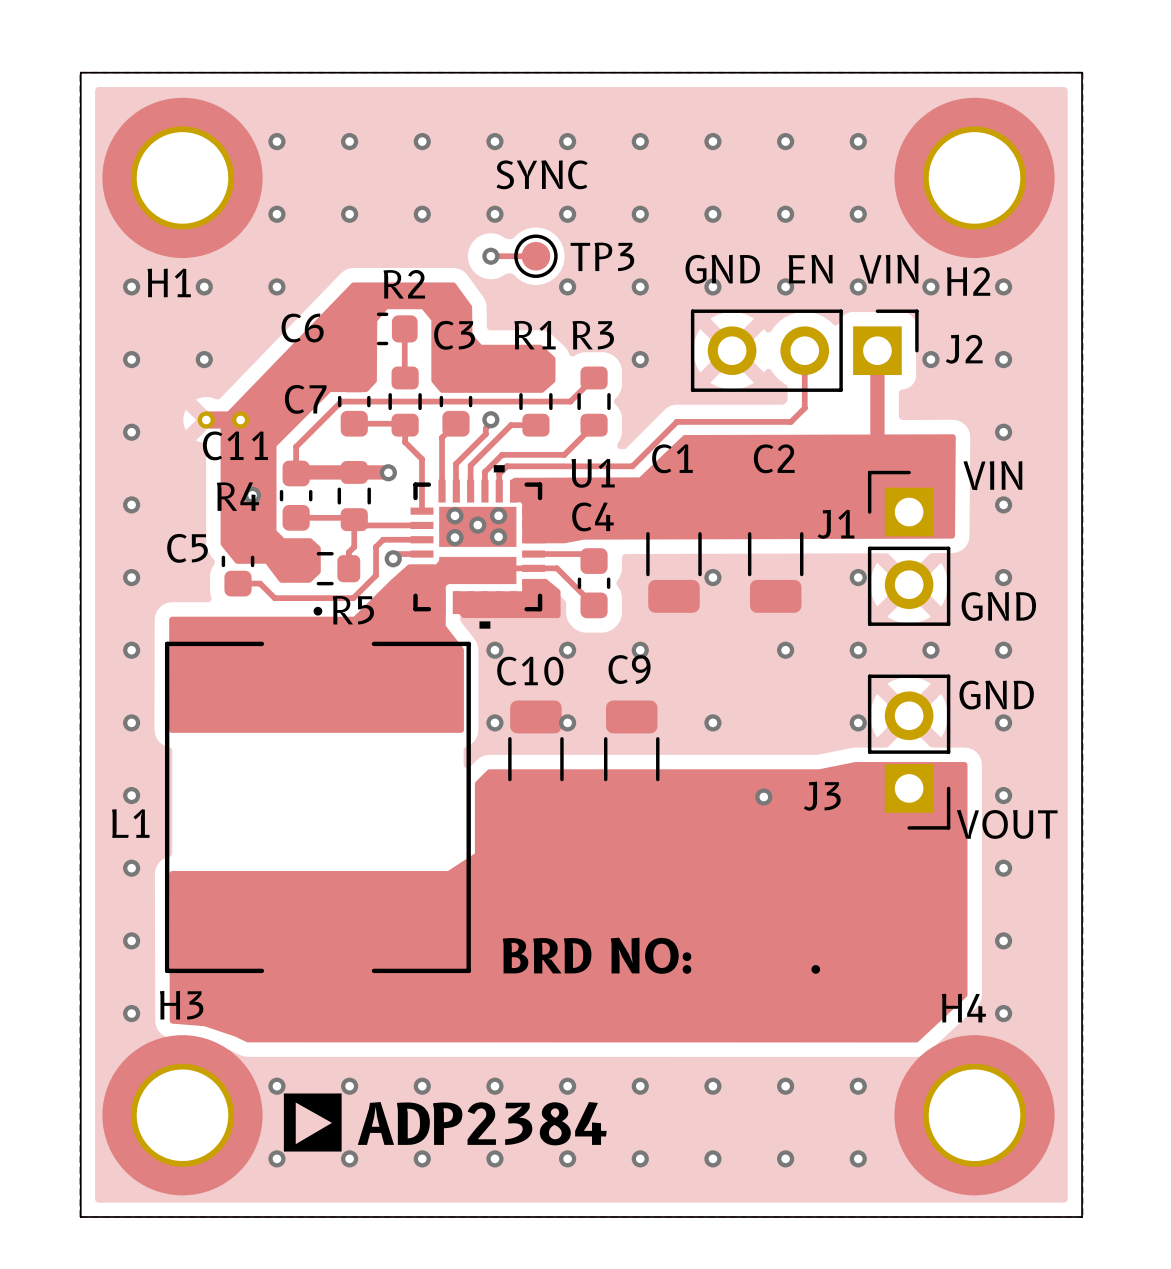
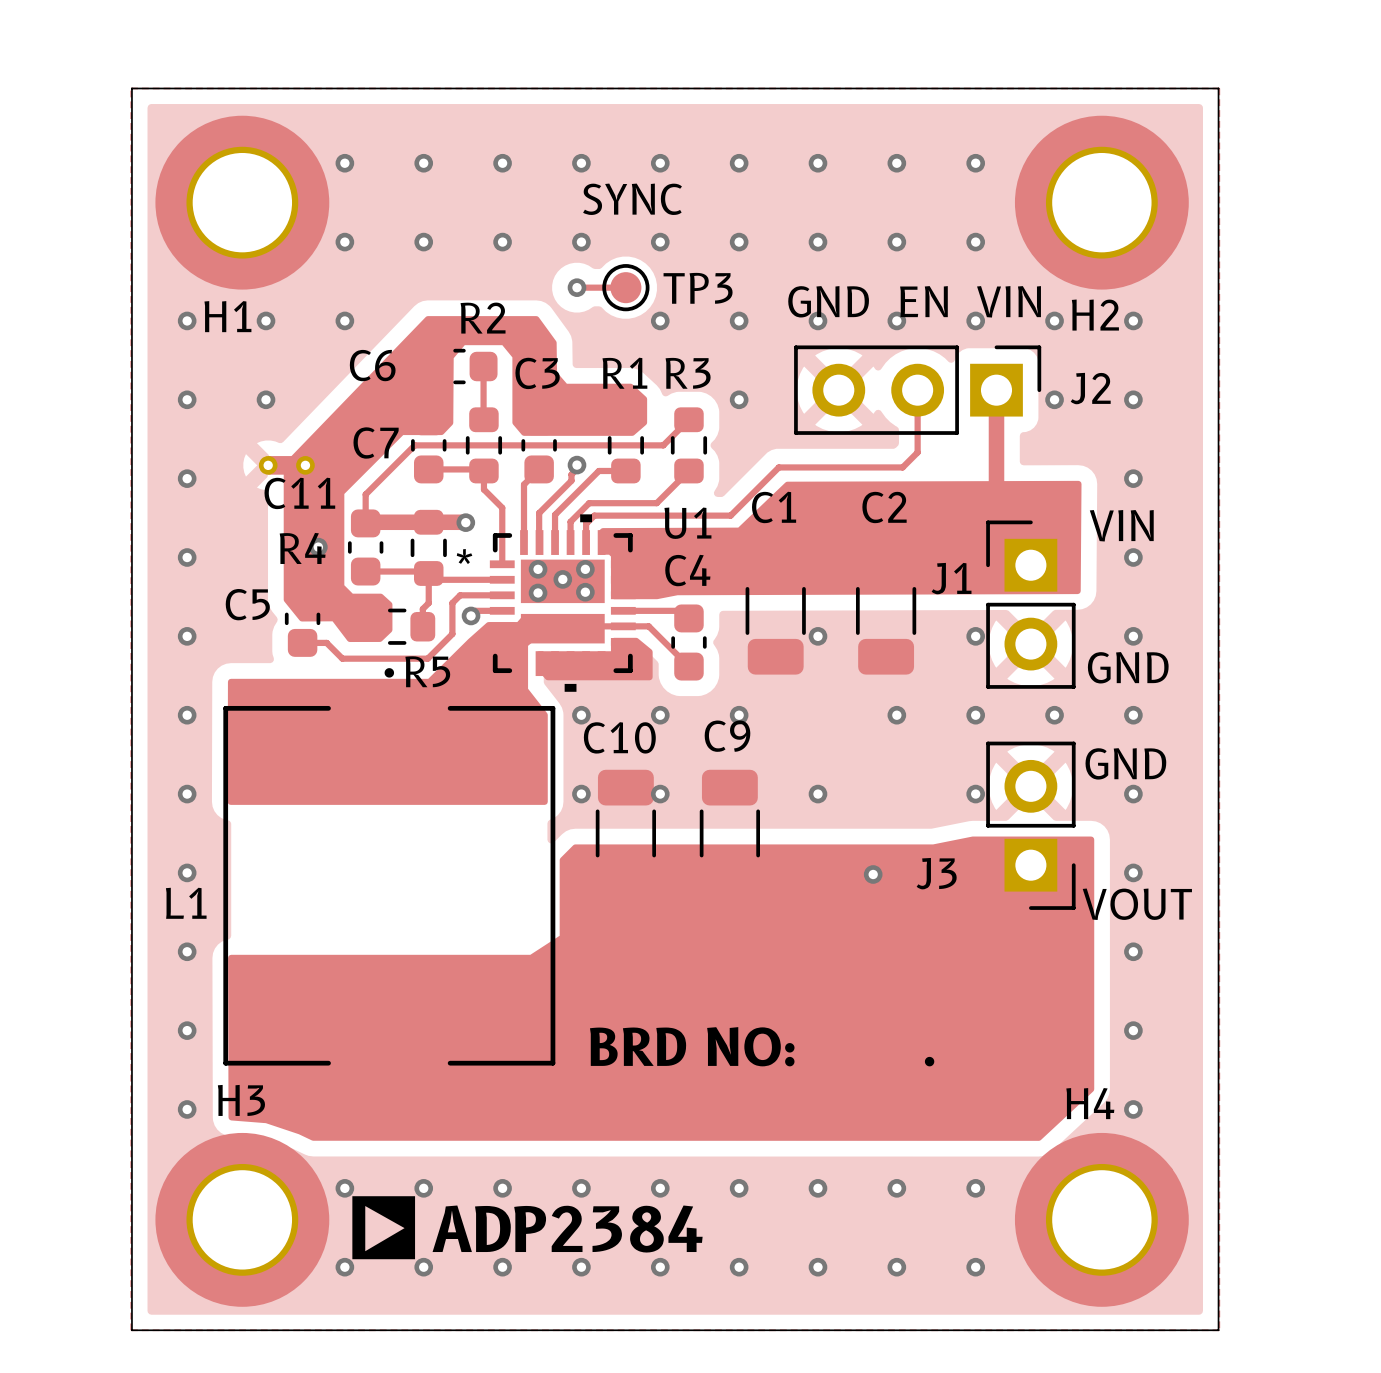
U1 text: none -> * (464, 556)

